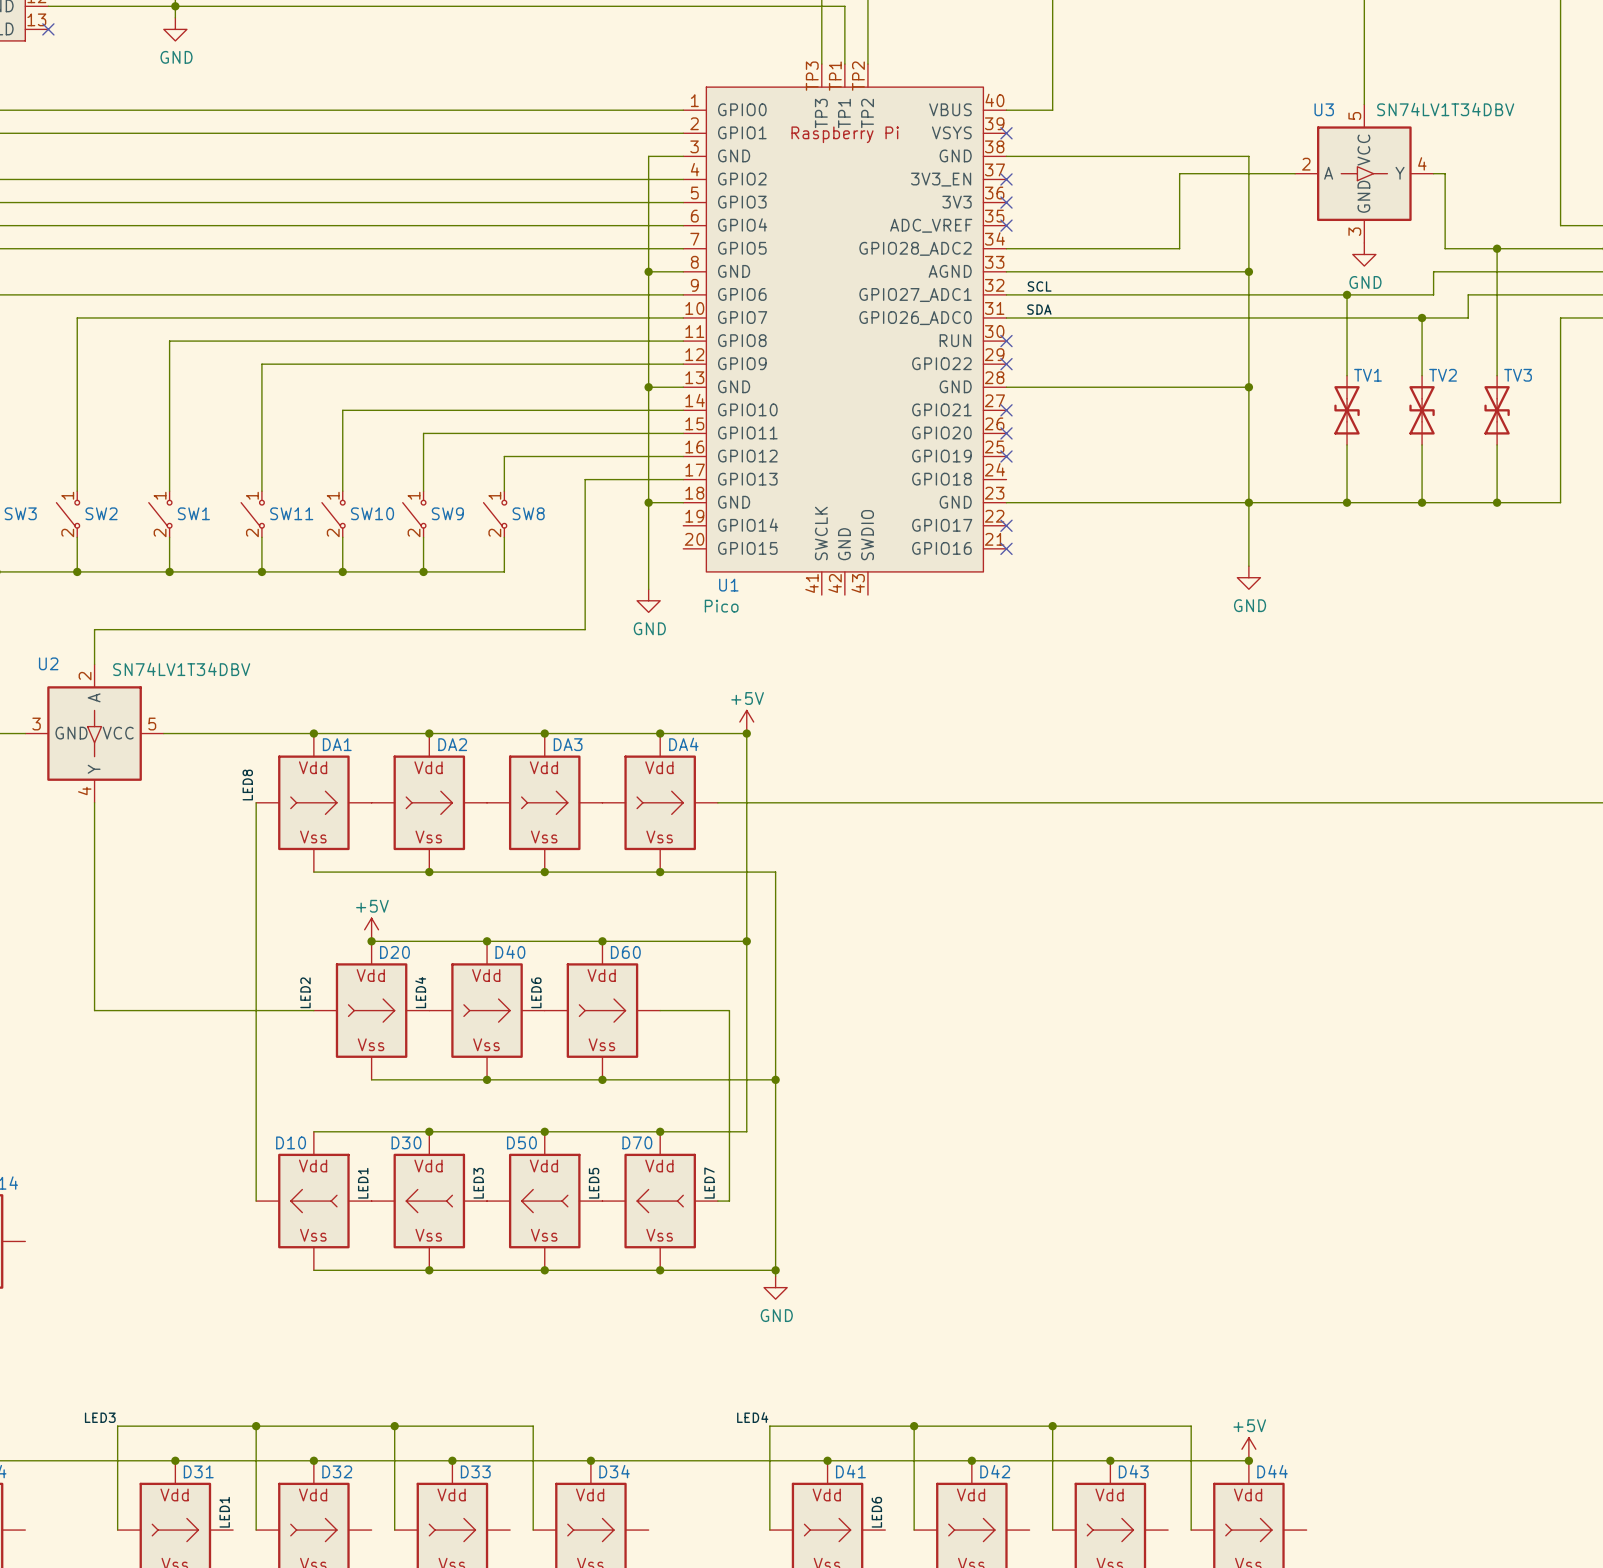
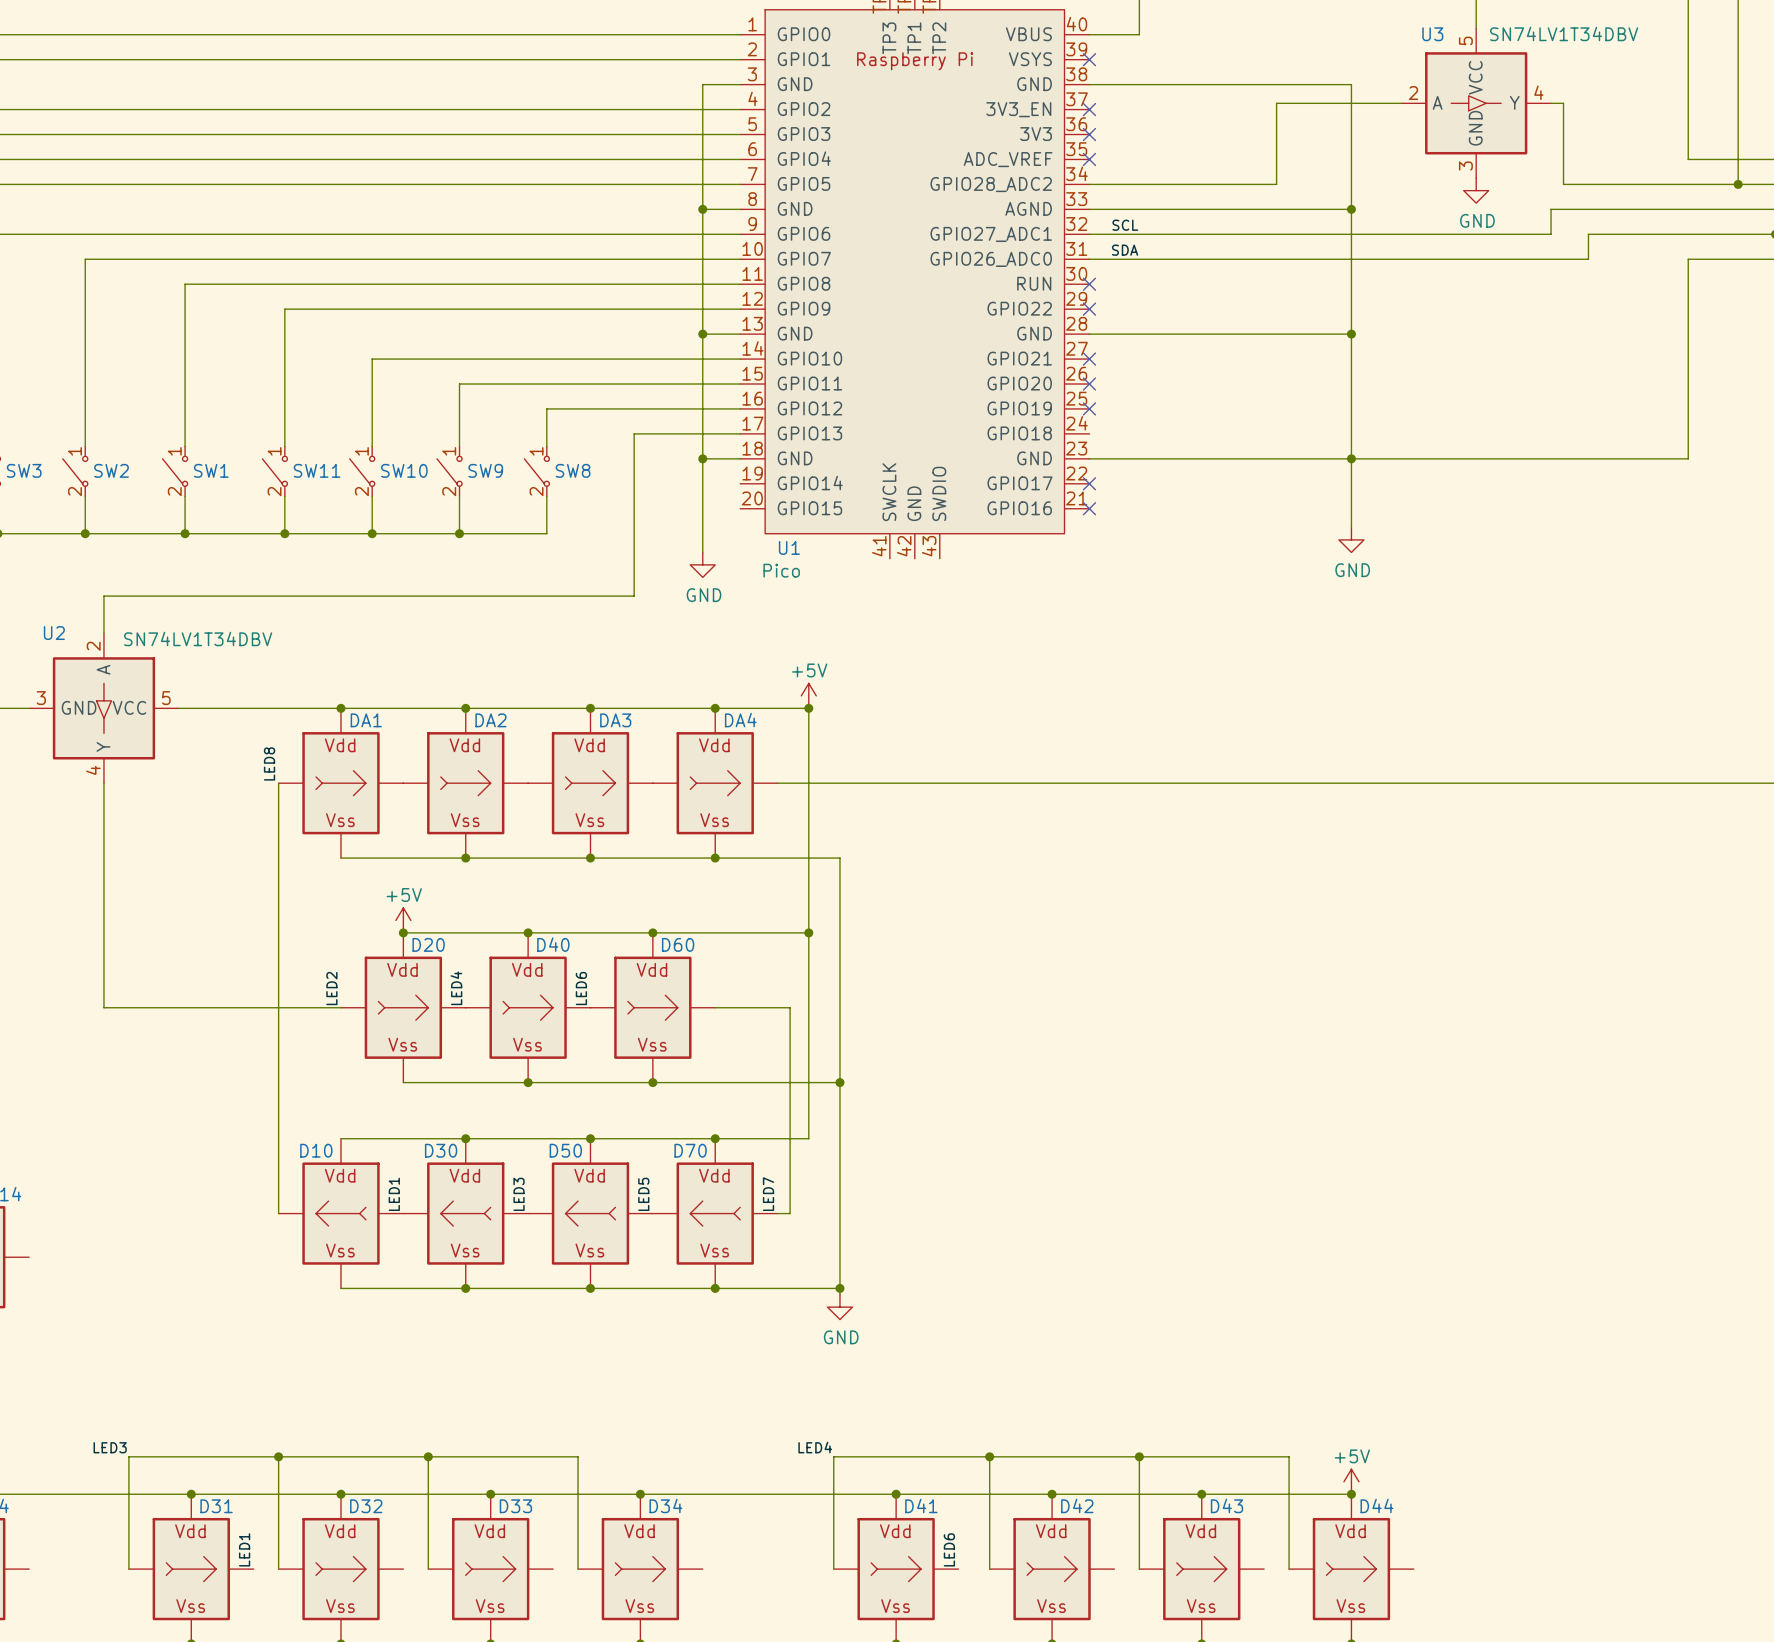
wire: (1497, 248) (1497, 375) -> none
junction: (1497, 248) -> none
wire: (1347, 294) (1347, 375) -> none
junction: (1347, 294) -> none
wire: (1422, 317) (1422, 375) -> none
junction: (1422, 317) -> none
TV1: (1347, 410) -> none
TV2: (1422, 410) -> none
TV3: (1497, 410) -> none
wire: (1347, 444) (1347, 502) -> none
wire: (1422, 444) (1422, 502) -> none
wire: (1497, 444) (1497, 502) -> none
junction: (1347, 502) -> none
junction: (1422, 502) -> none
junction: (1497, 502) -> none

